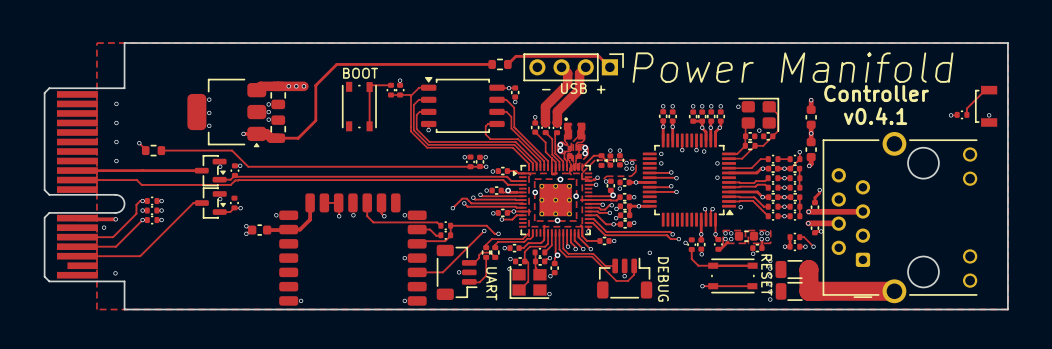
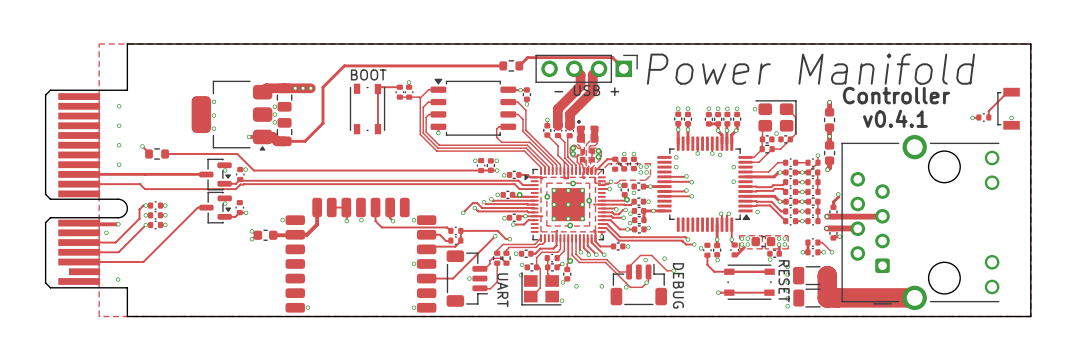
via: none -> (645, 260)
track: none -> (673, 270) (667, 270) (651, 255) (640, 255) (629, 266) (629, 271)
via: none -> (673, 270)
via: (624, 276) -> none
via: none -> (646, 282)
via: none -> (576, 286)
via: none -> (601, 286)
via: none -> (626, 287)

